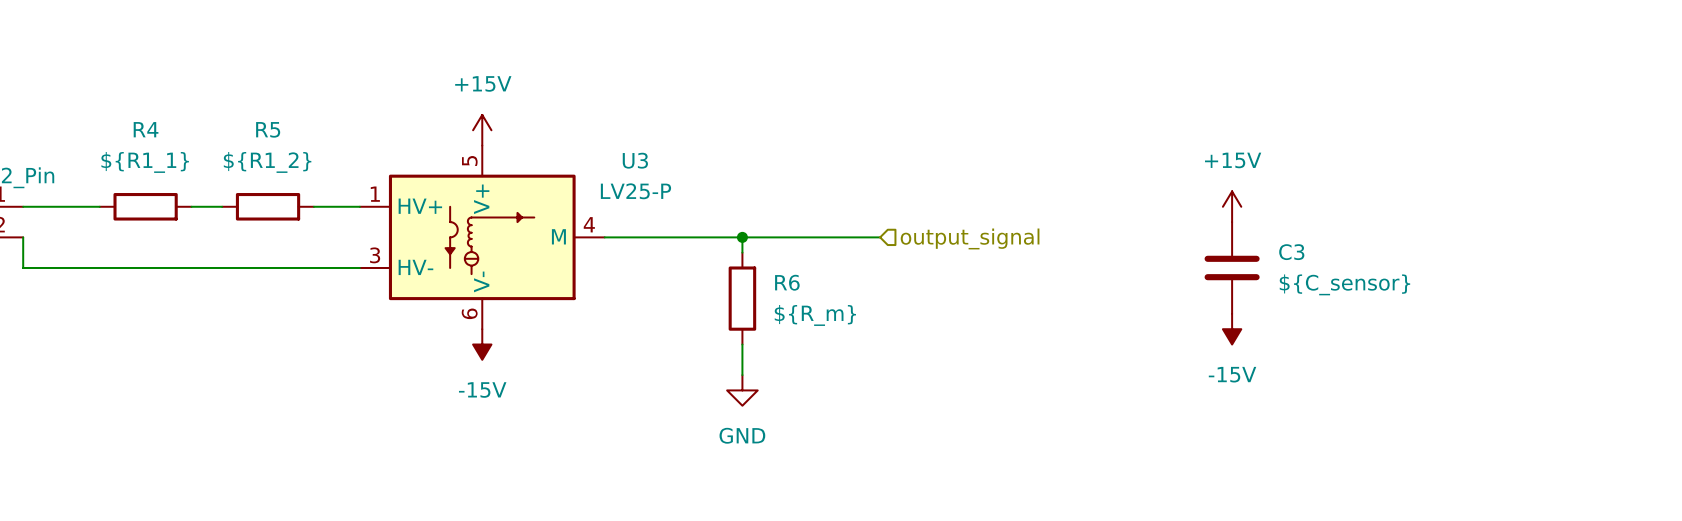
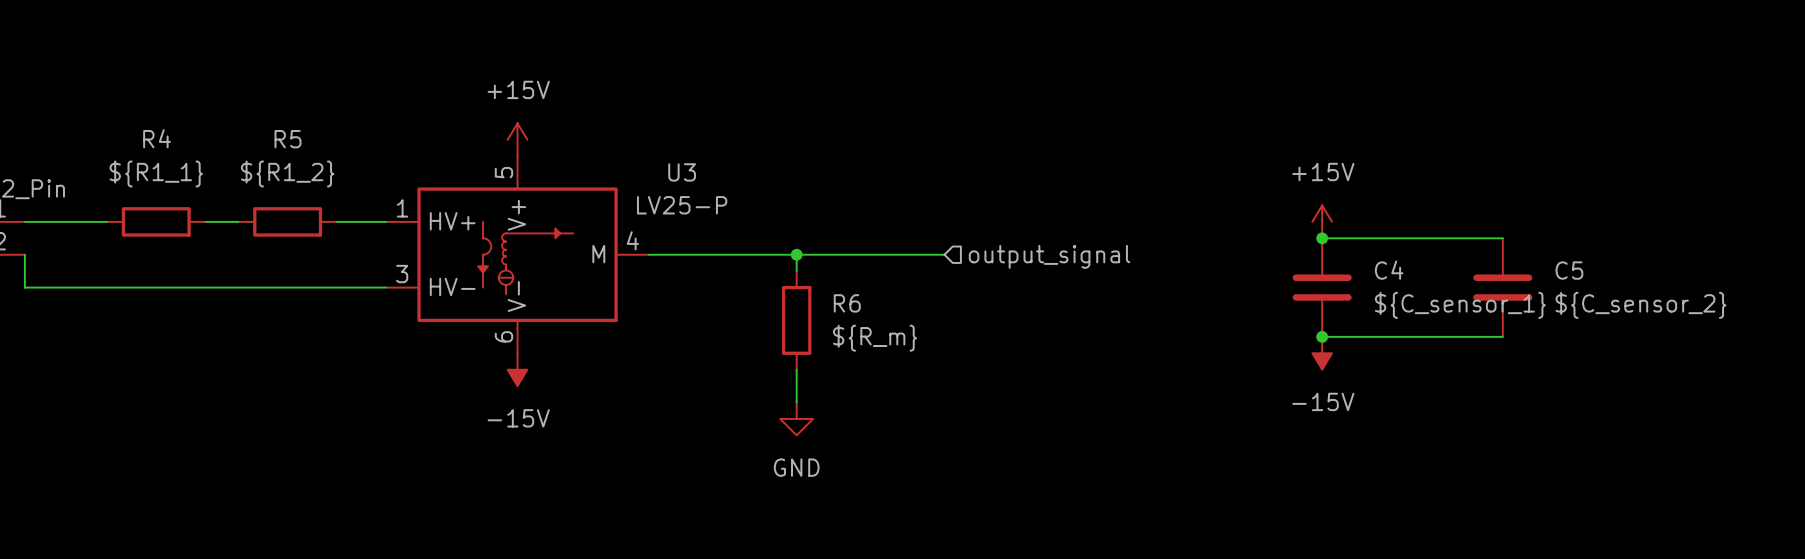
wire: none -> (1322, 238) (1502, 238)
junction: none -> (1322, 238)
C3 name: C3 (1291, 252) -> C4 (1389, 270)
C5: none -> ${C_sensor_2} (1502, 287)
C3 value: ${C_sensor} (1344, 284) -> ${C_sensor_1} (1460, 305)
wire: none -> (1322, 336) (1502, 336)
junction: none -> (1322, 336)

